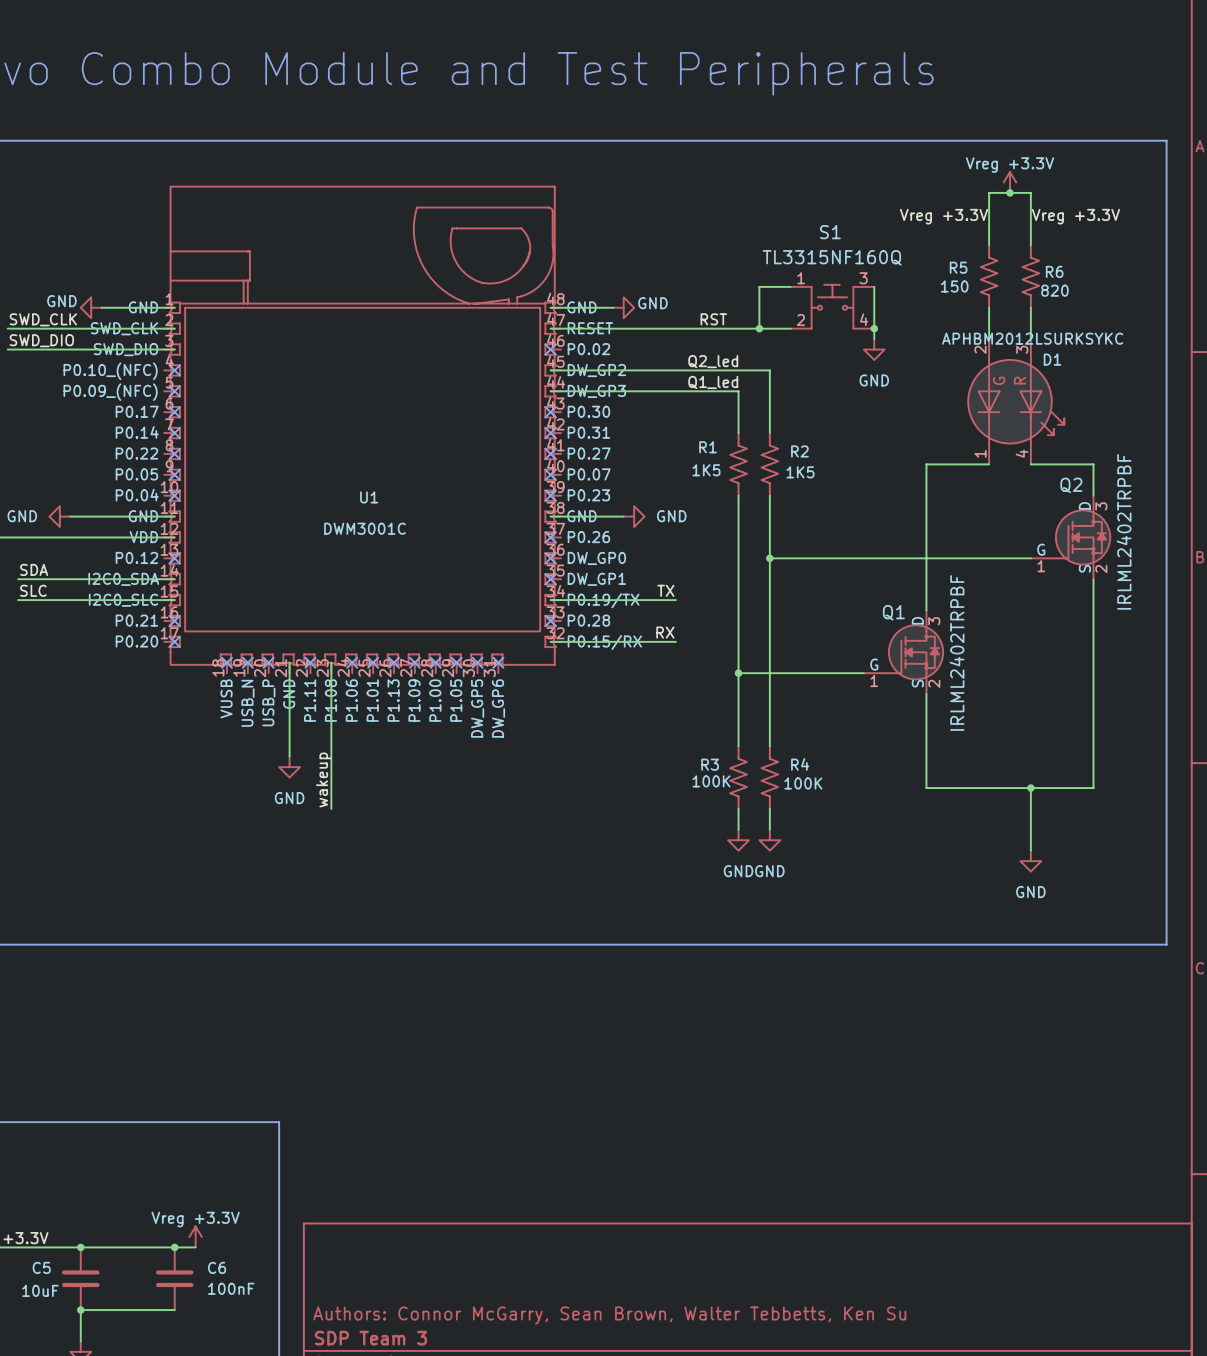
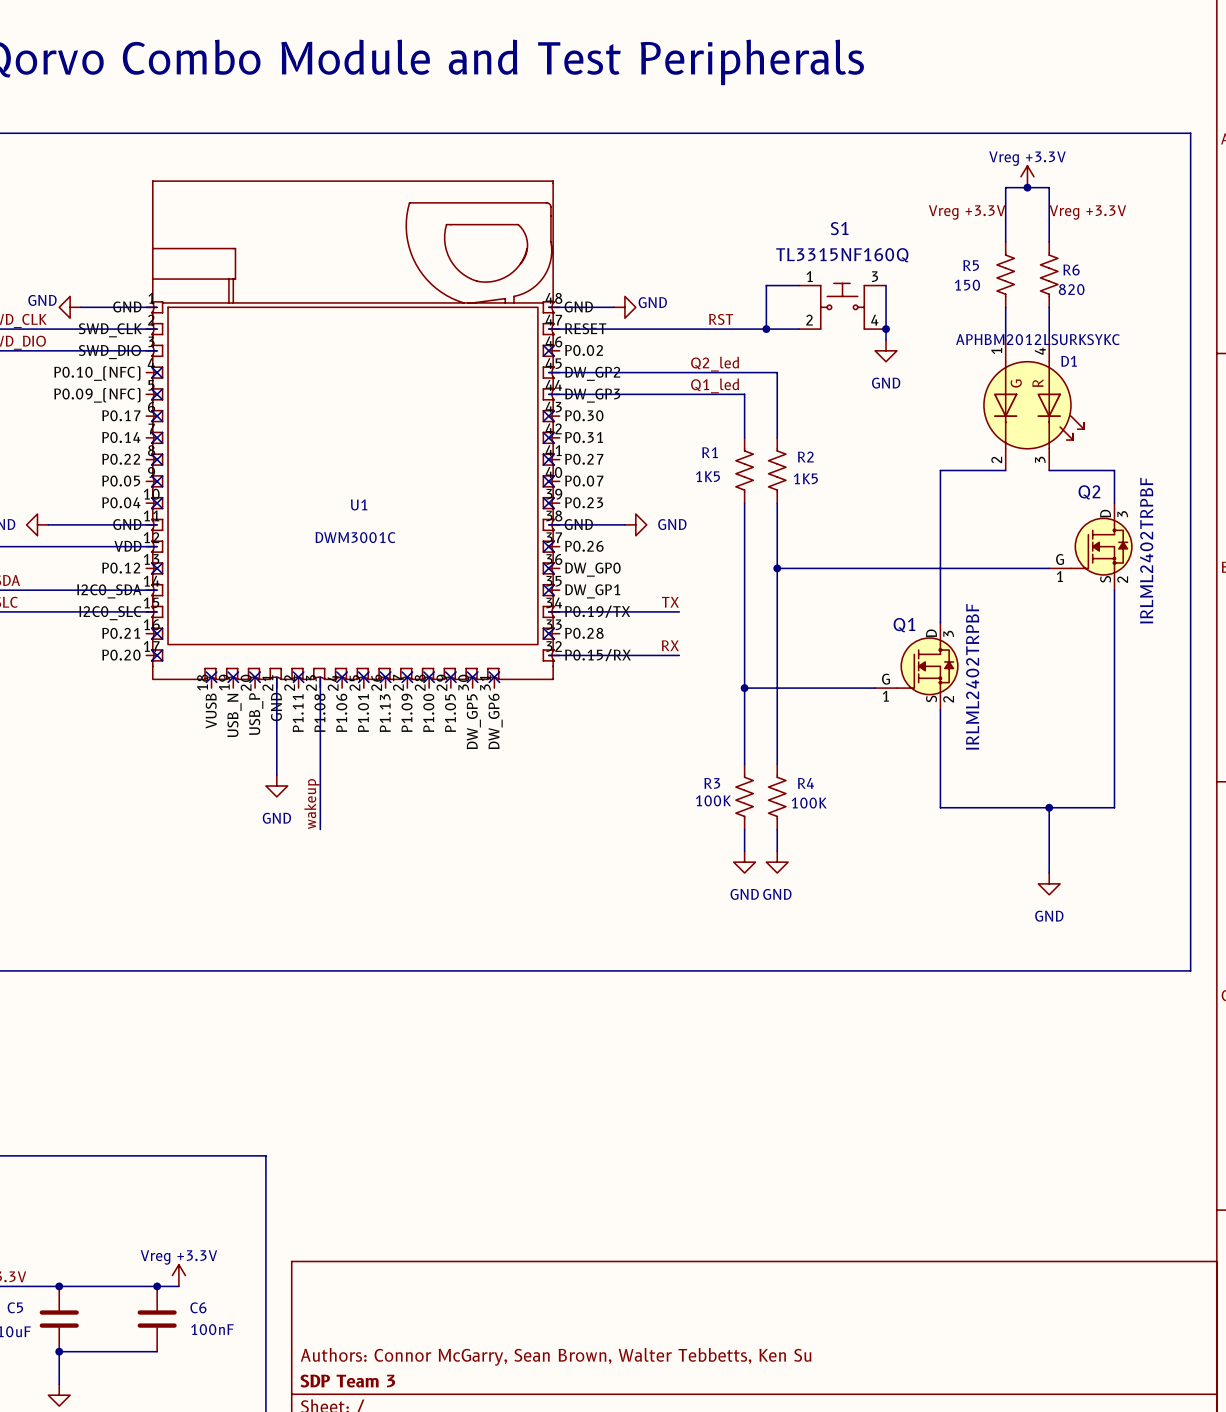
D1 pin number: 2 (980, 349) -> 1 (996, 351)
D1 pin number: 3 (1022, 349) -> 4 (1040, 351)
D1 pin number: 1 (980, 453) -> 2 (996, 459)
D1 pin number: 4 (1022, 453) -> 3 (1040, 459)

